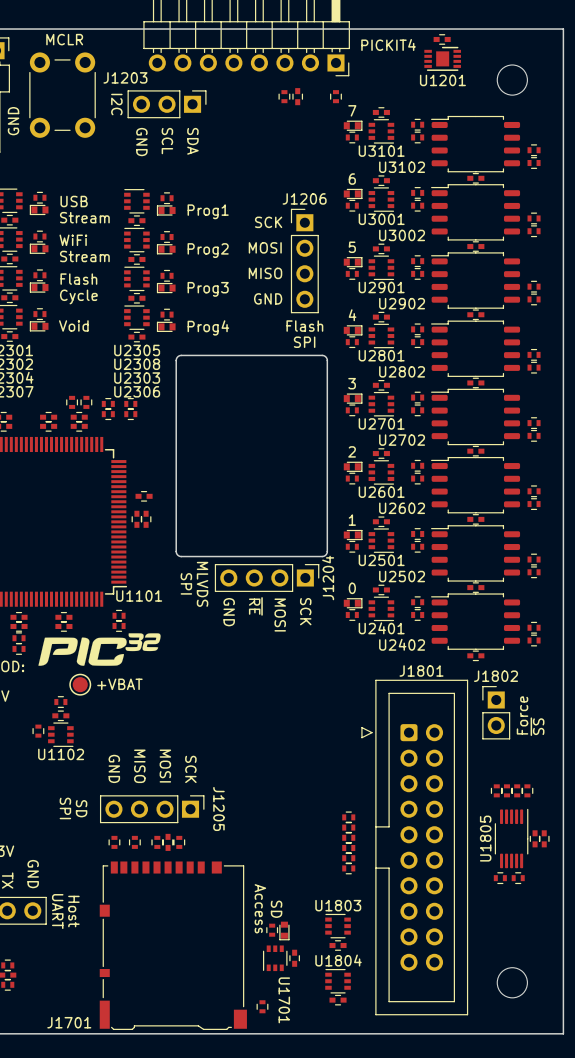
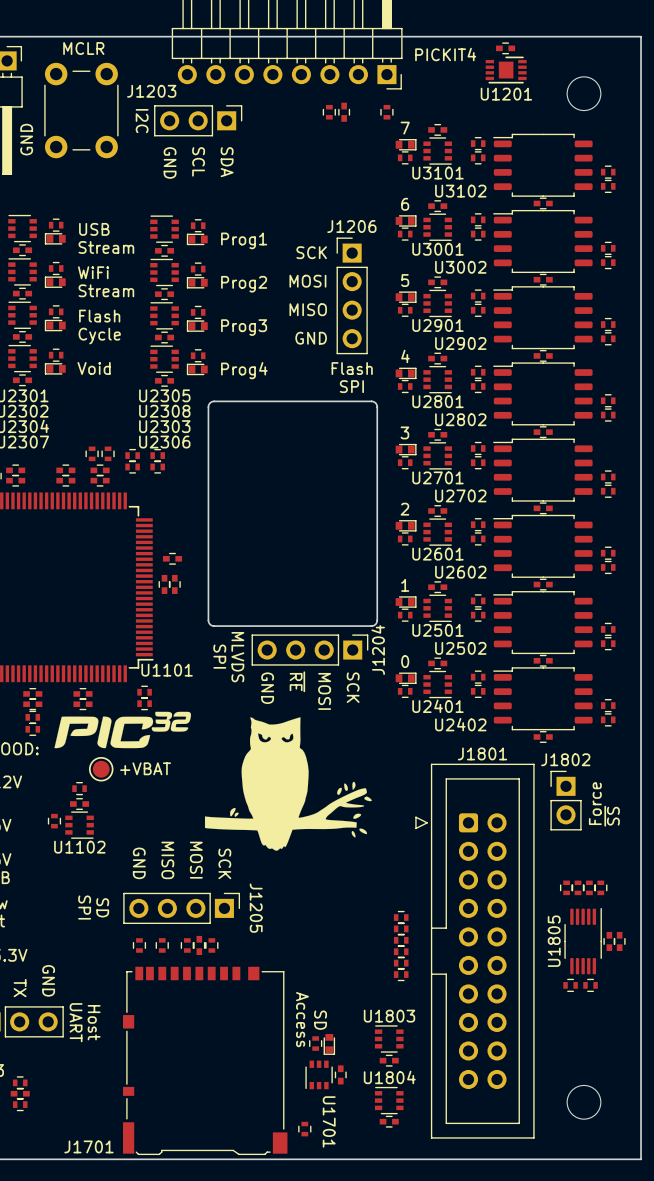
drawing: none -> [204, 717, 372, 851]

